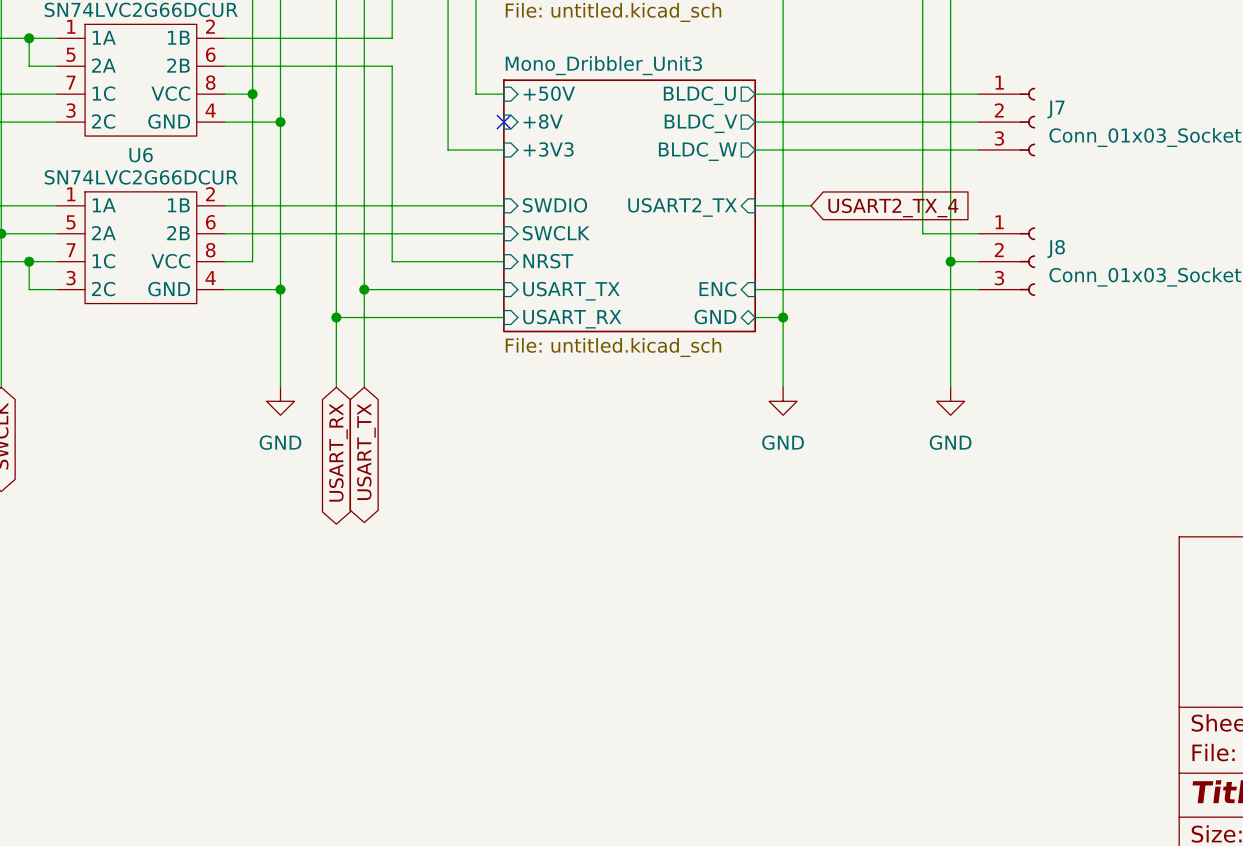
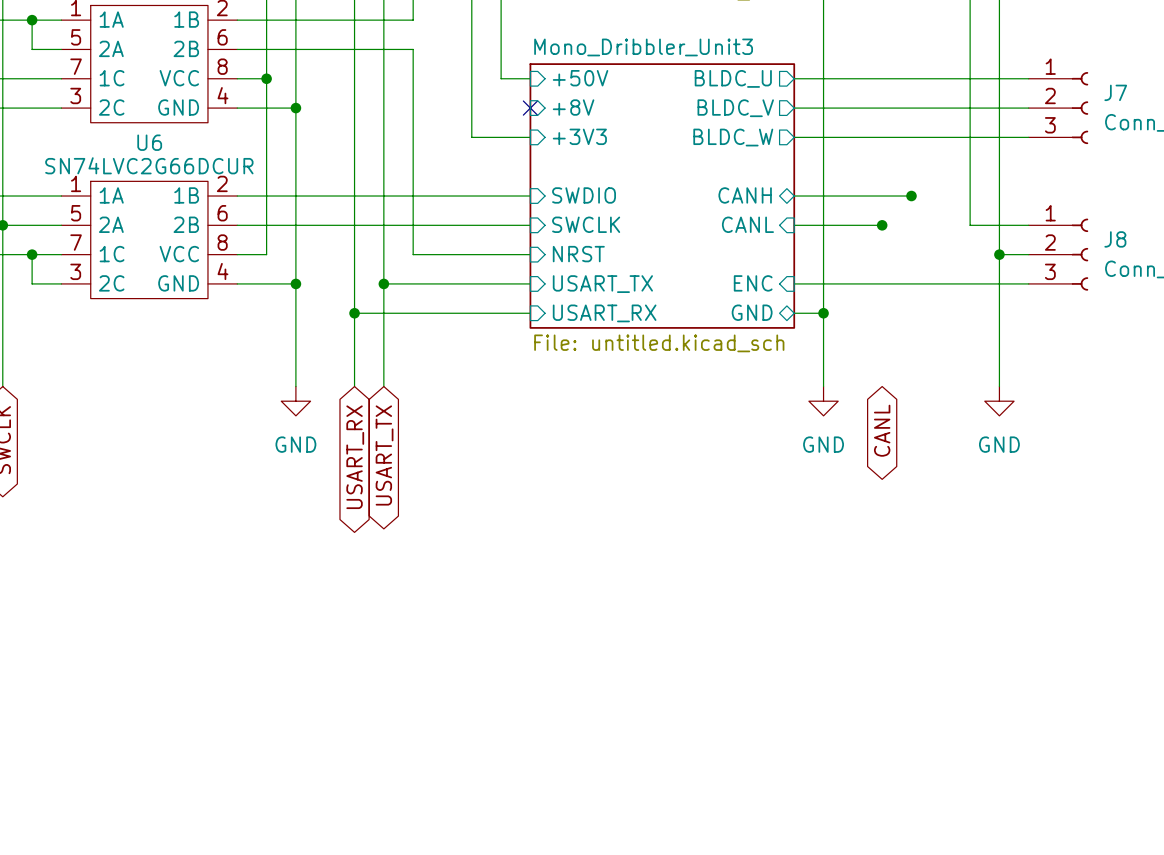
wire: none -> (852, 196) (911, 196)
junction: none -> (911, 196)
sheet pin shape: input (682, 207) -> bidirectional (745, 195)
sheet pin: USART2_TX (682, 207) -> CANH (745, 195)
global label: USART2_TX_4 (893, 207) -> none
sheet pin: none -> CANL (747, 224)
wire: none -> (794, 225) (882, 225)
junction: none -> (882, 225)
global label: none -> CANL (882, 430)

